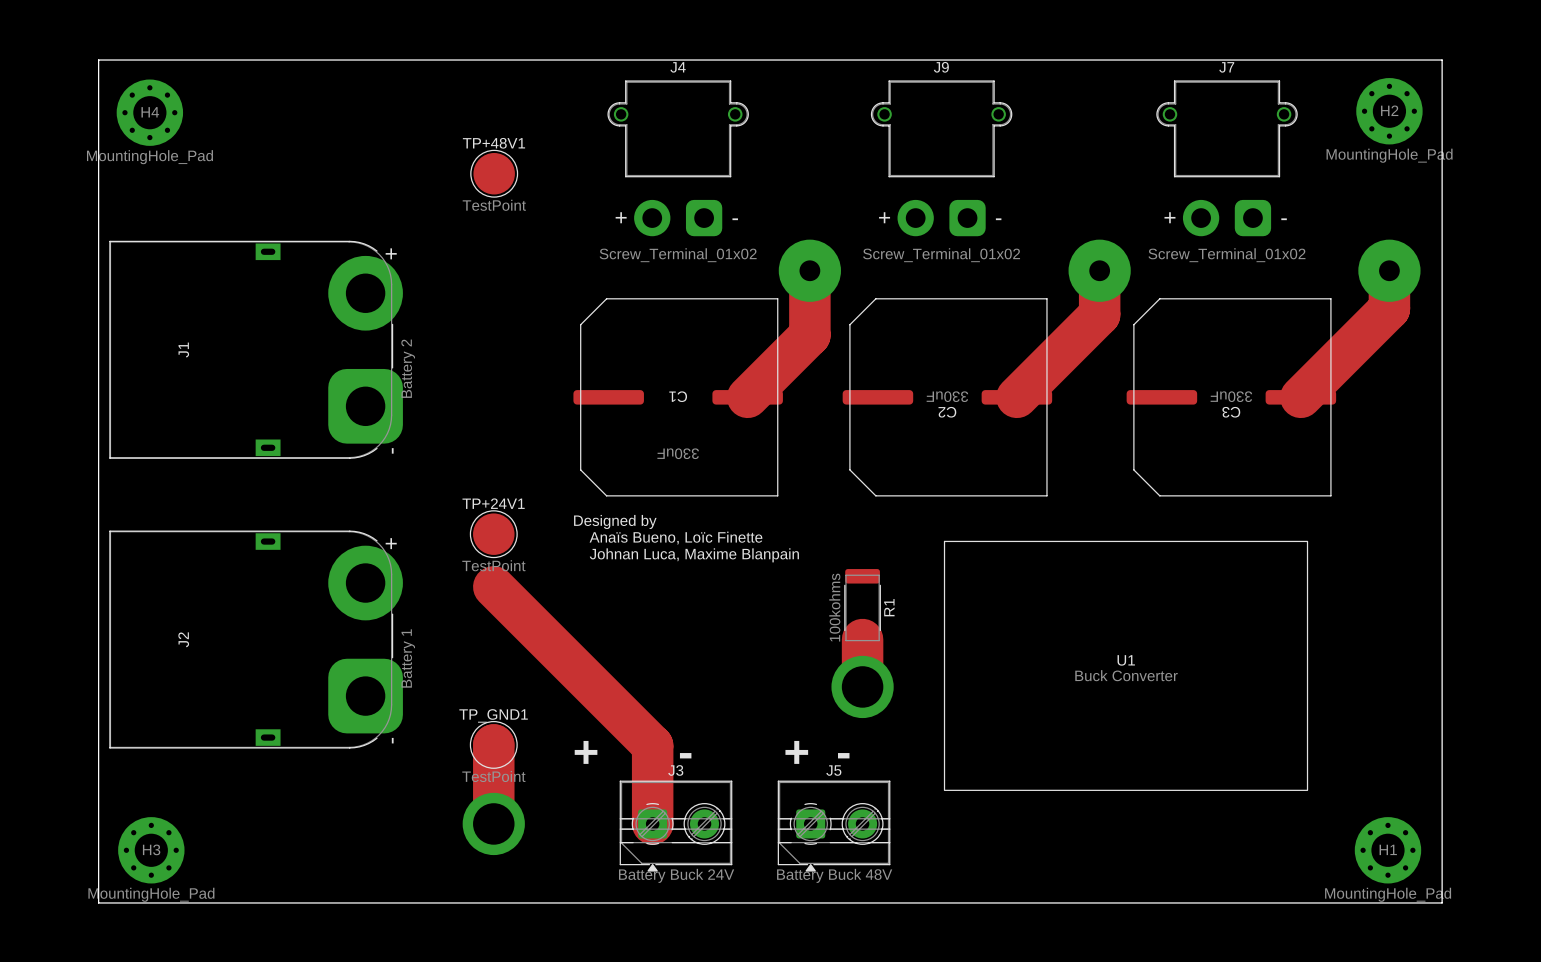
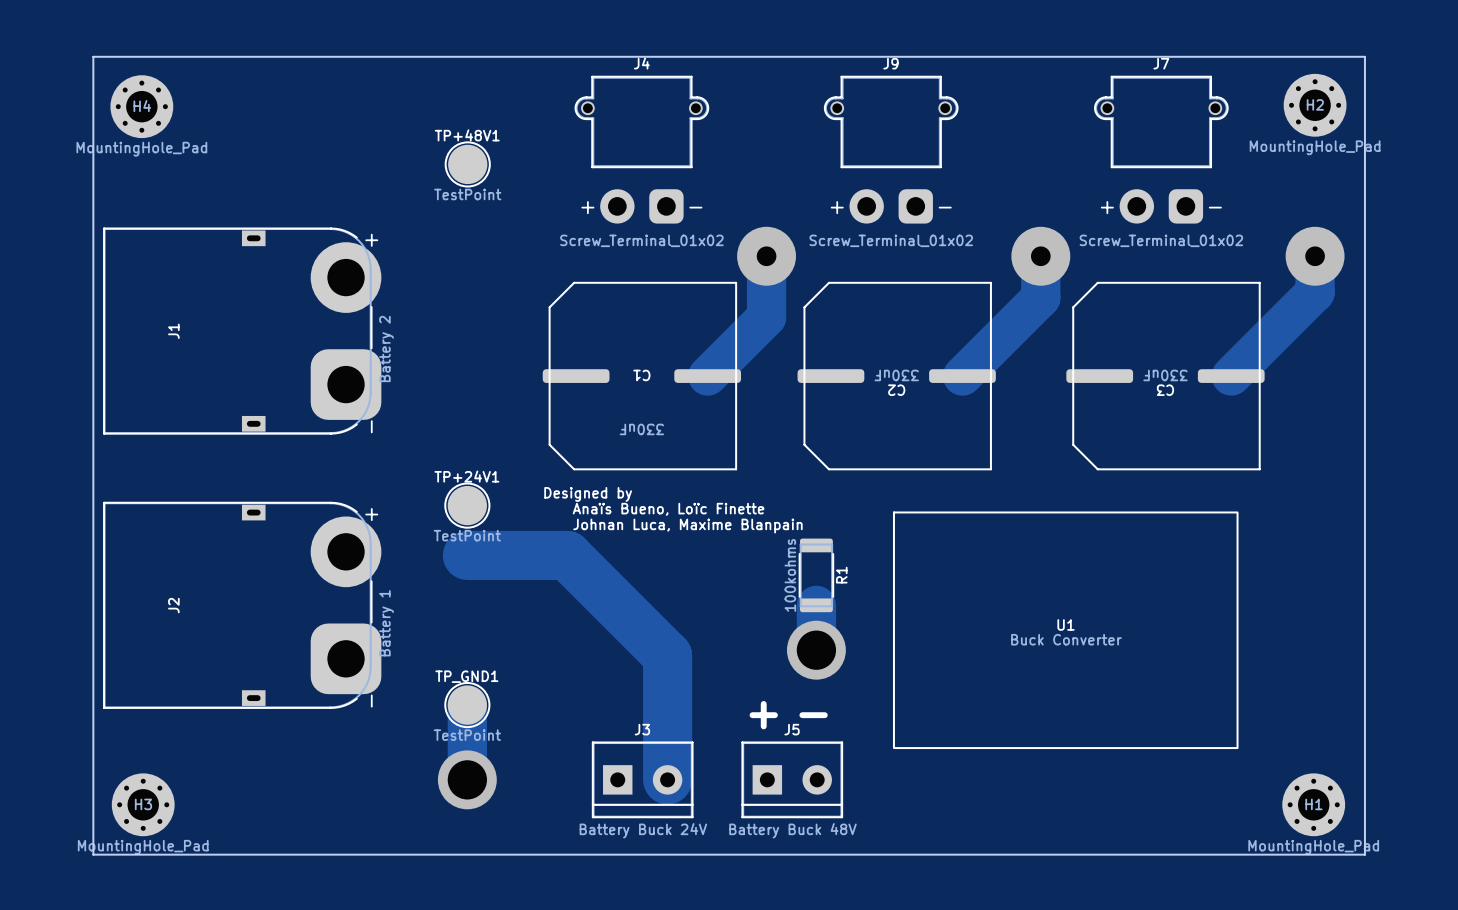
track: (493, 586) (652, 745) (652, 823) -> (467, 555) (567, 555) (667, 655) (667, 779)
text: + (586, 752) -> none
text: - (685, 755) -> none
J3 footprint: [619, 780, 733, 872] -> [592, 741, 694, 818]
J5 footprint: [777, 780, 891, 872] -> [741, 741, 843, 818]

